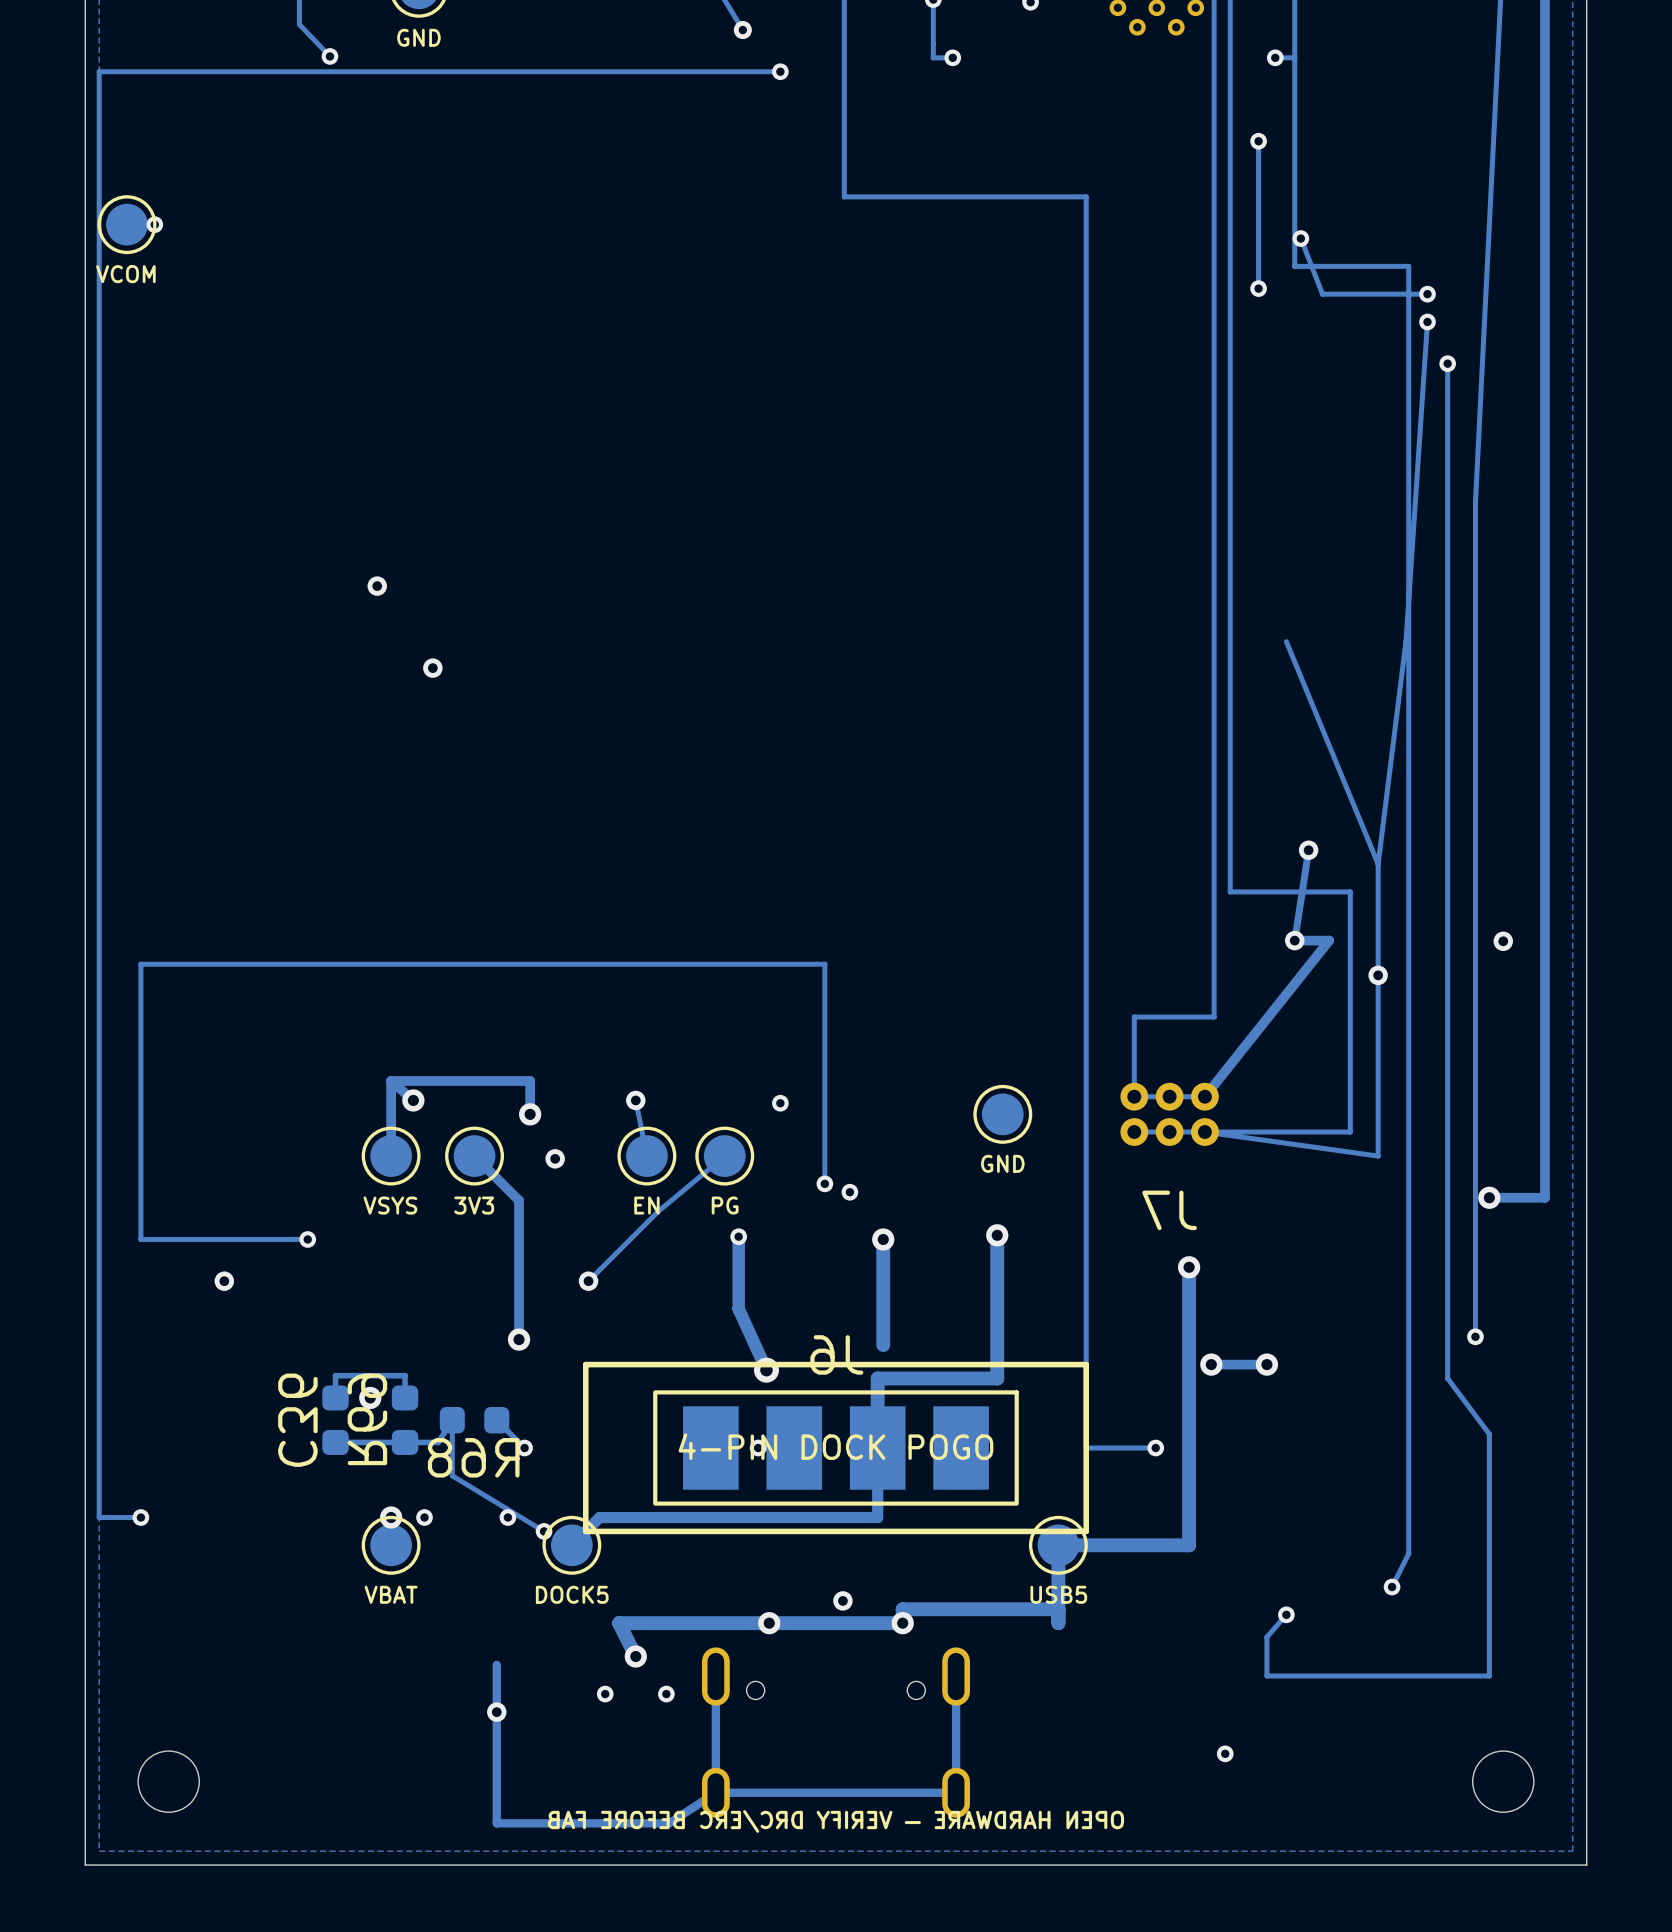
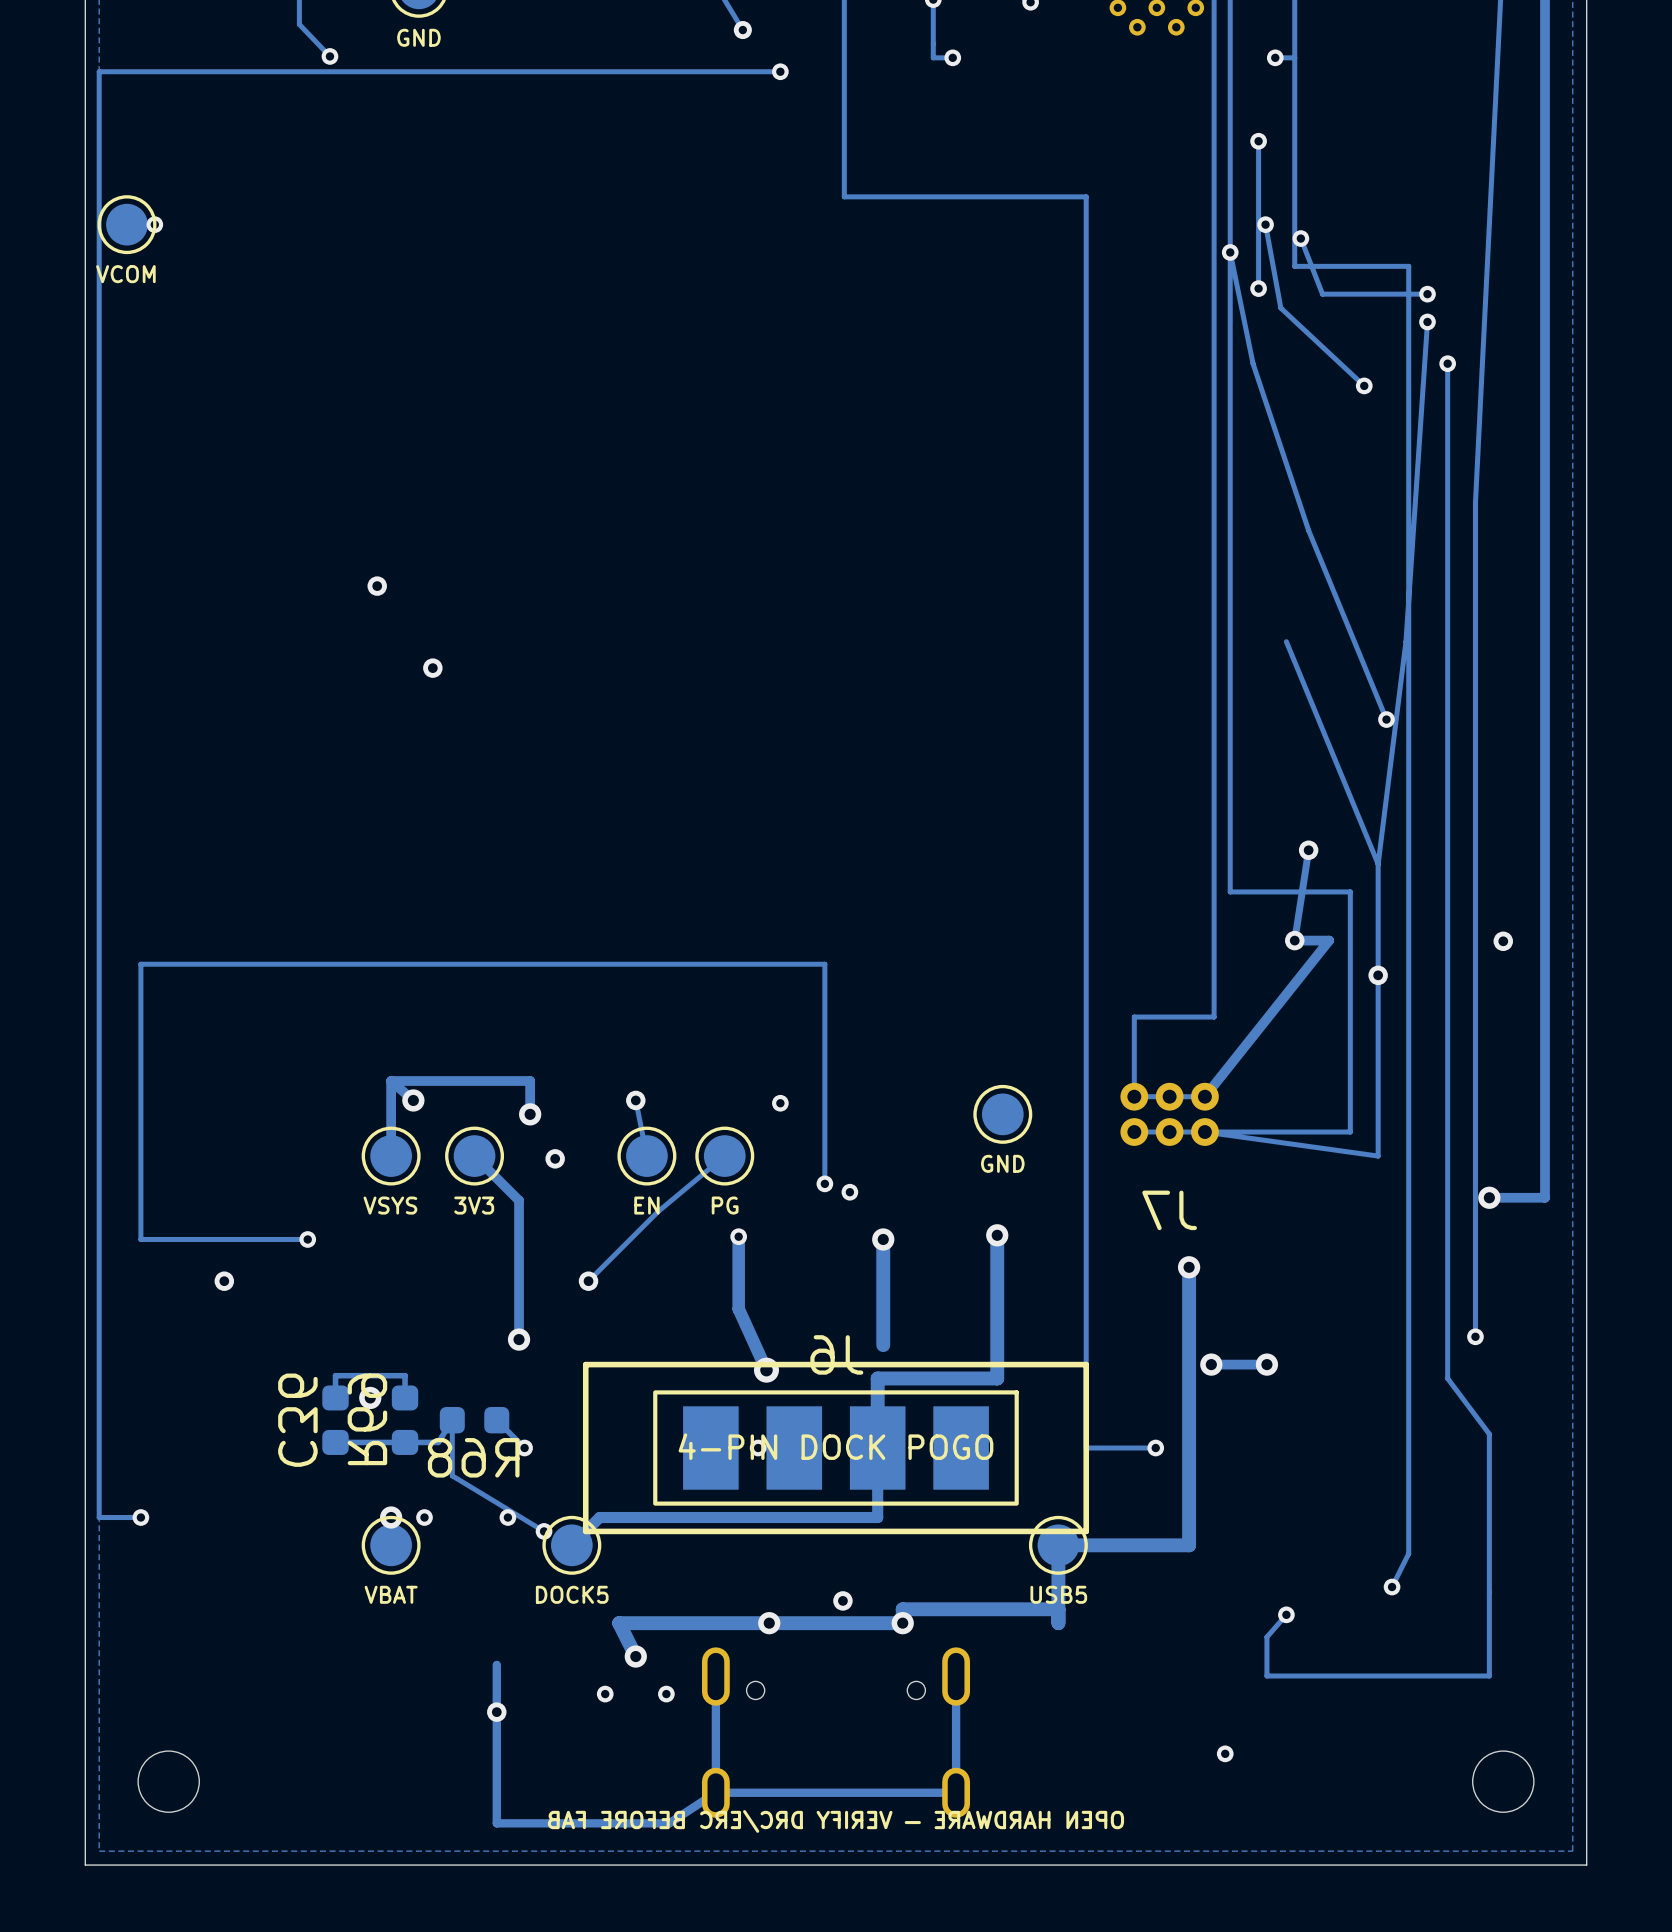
track: none -> (1265, 224) (1280, 308) (1364, 385)
via: none -> (1265, 224)
track: none -> (1230, 252) (1253, 363) (1308, 530) (1386, 719)
via: none -> (1230, 252)
via: none -> (1364, 385)
via: none -> (1386, 719)

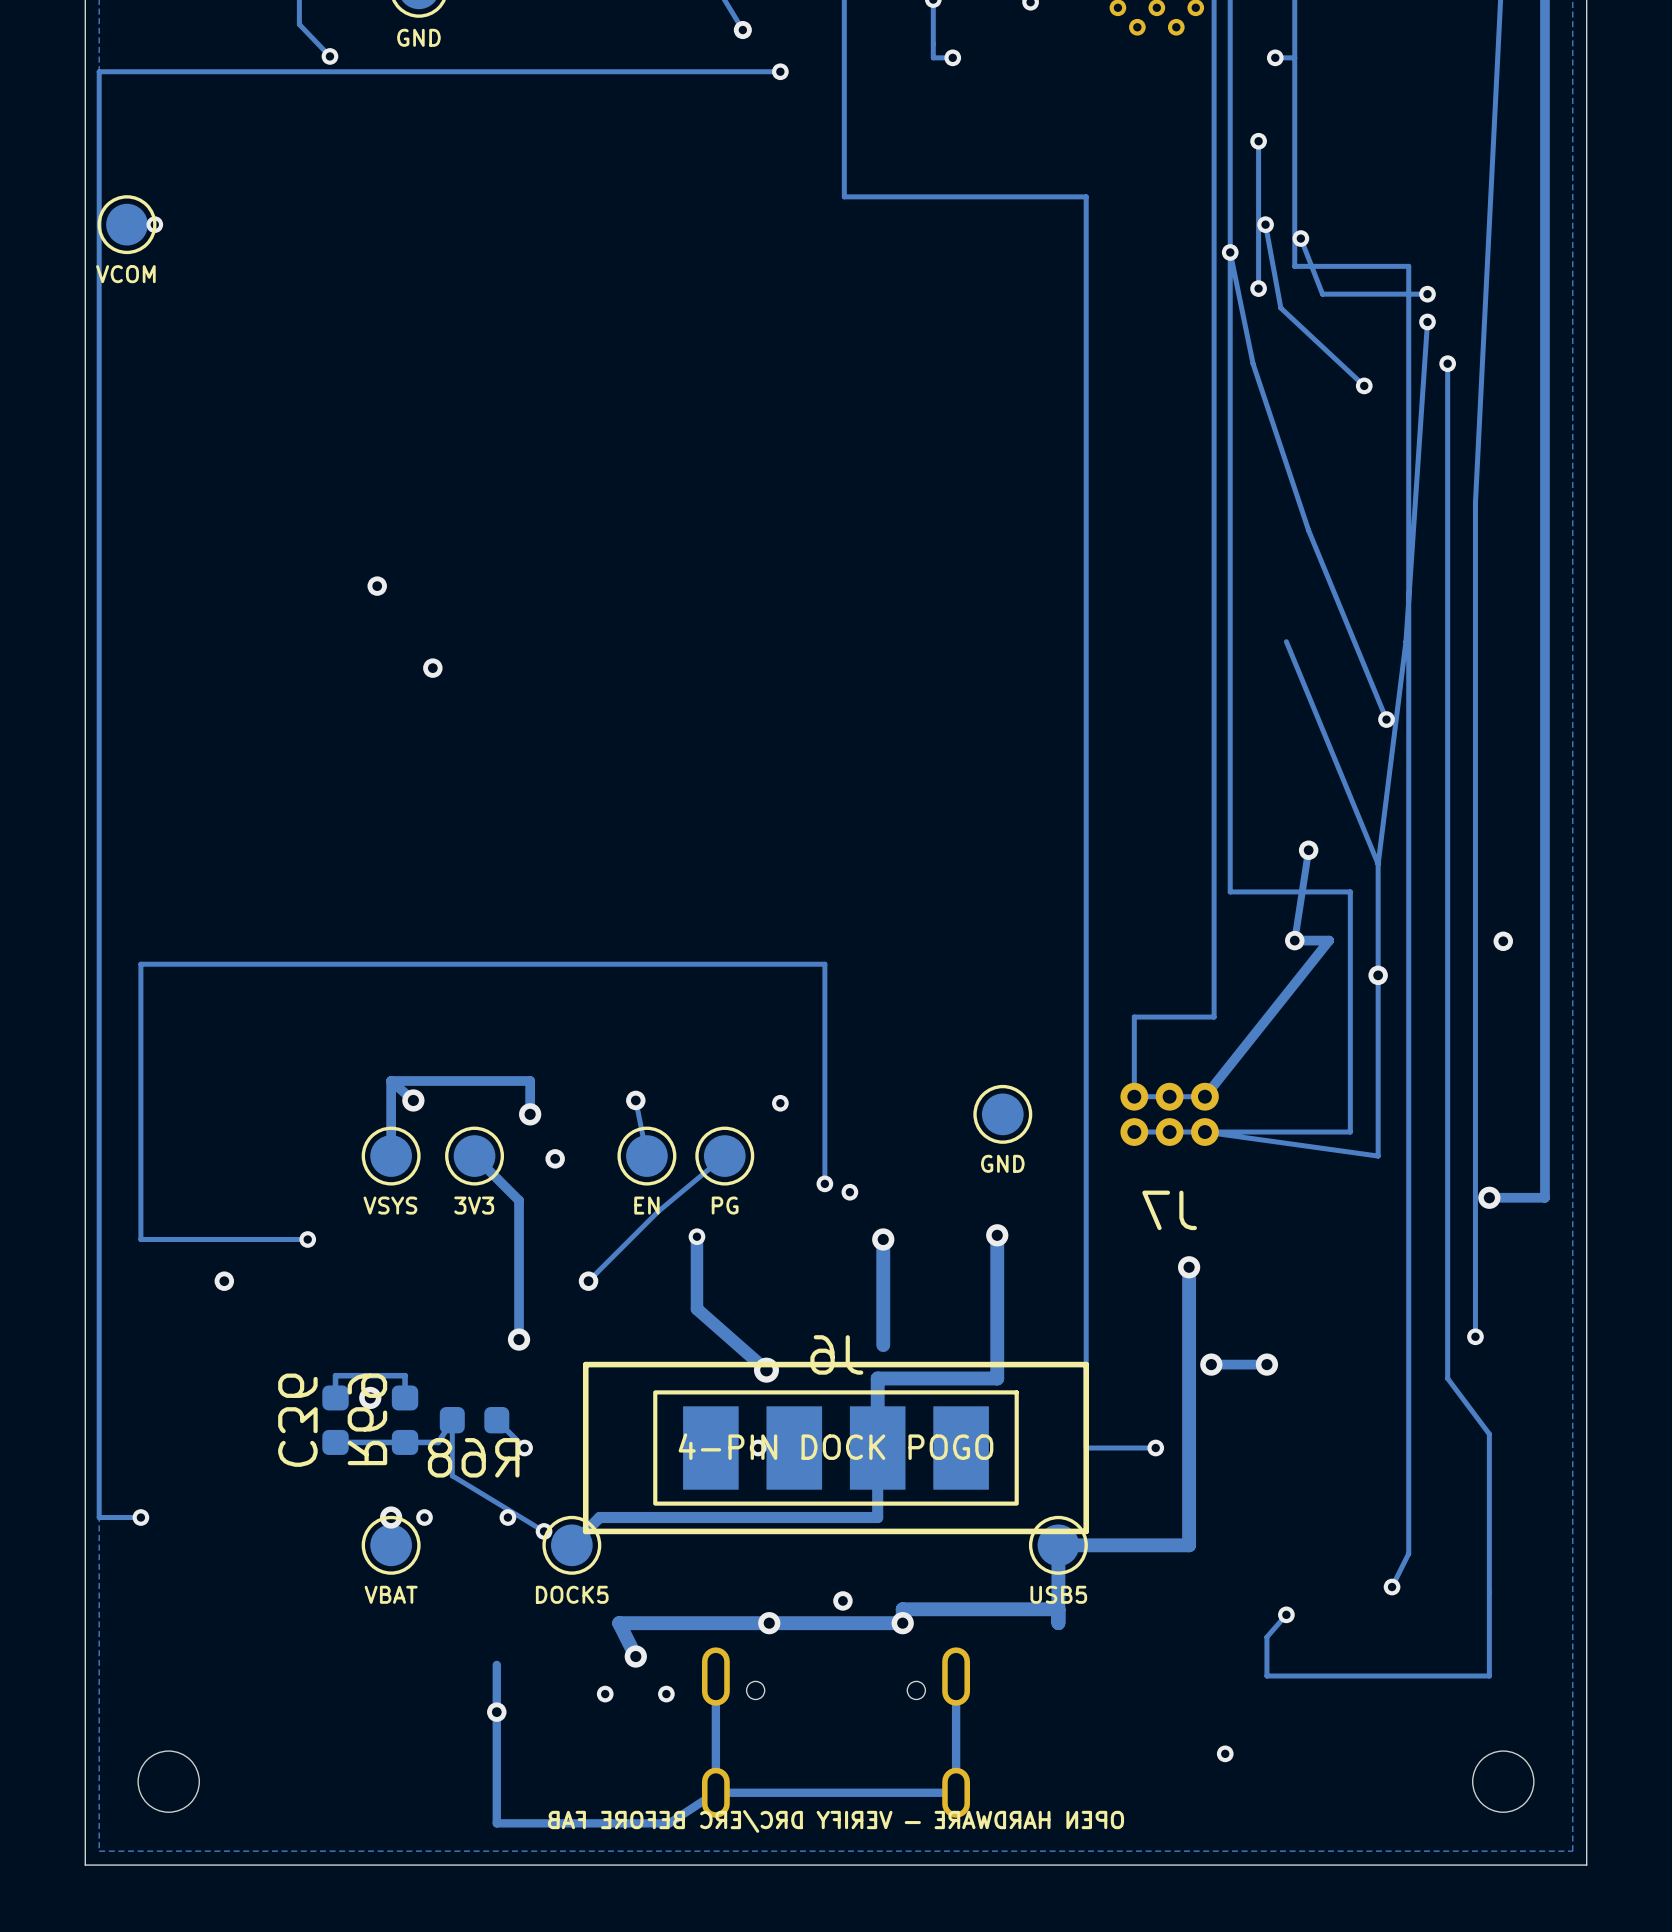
track: (738, 1236) (738, 1308) (766, 1370) -> (696, 1236) (696, 1308) (766, 1370)
via position: (738, 1236) -> (696, 1236)

